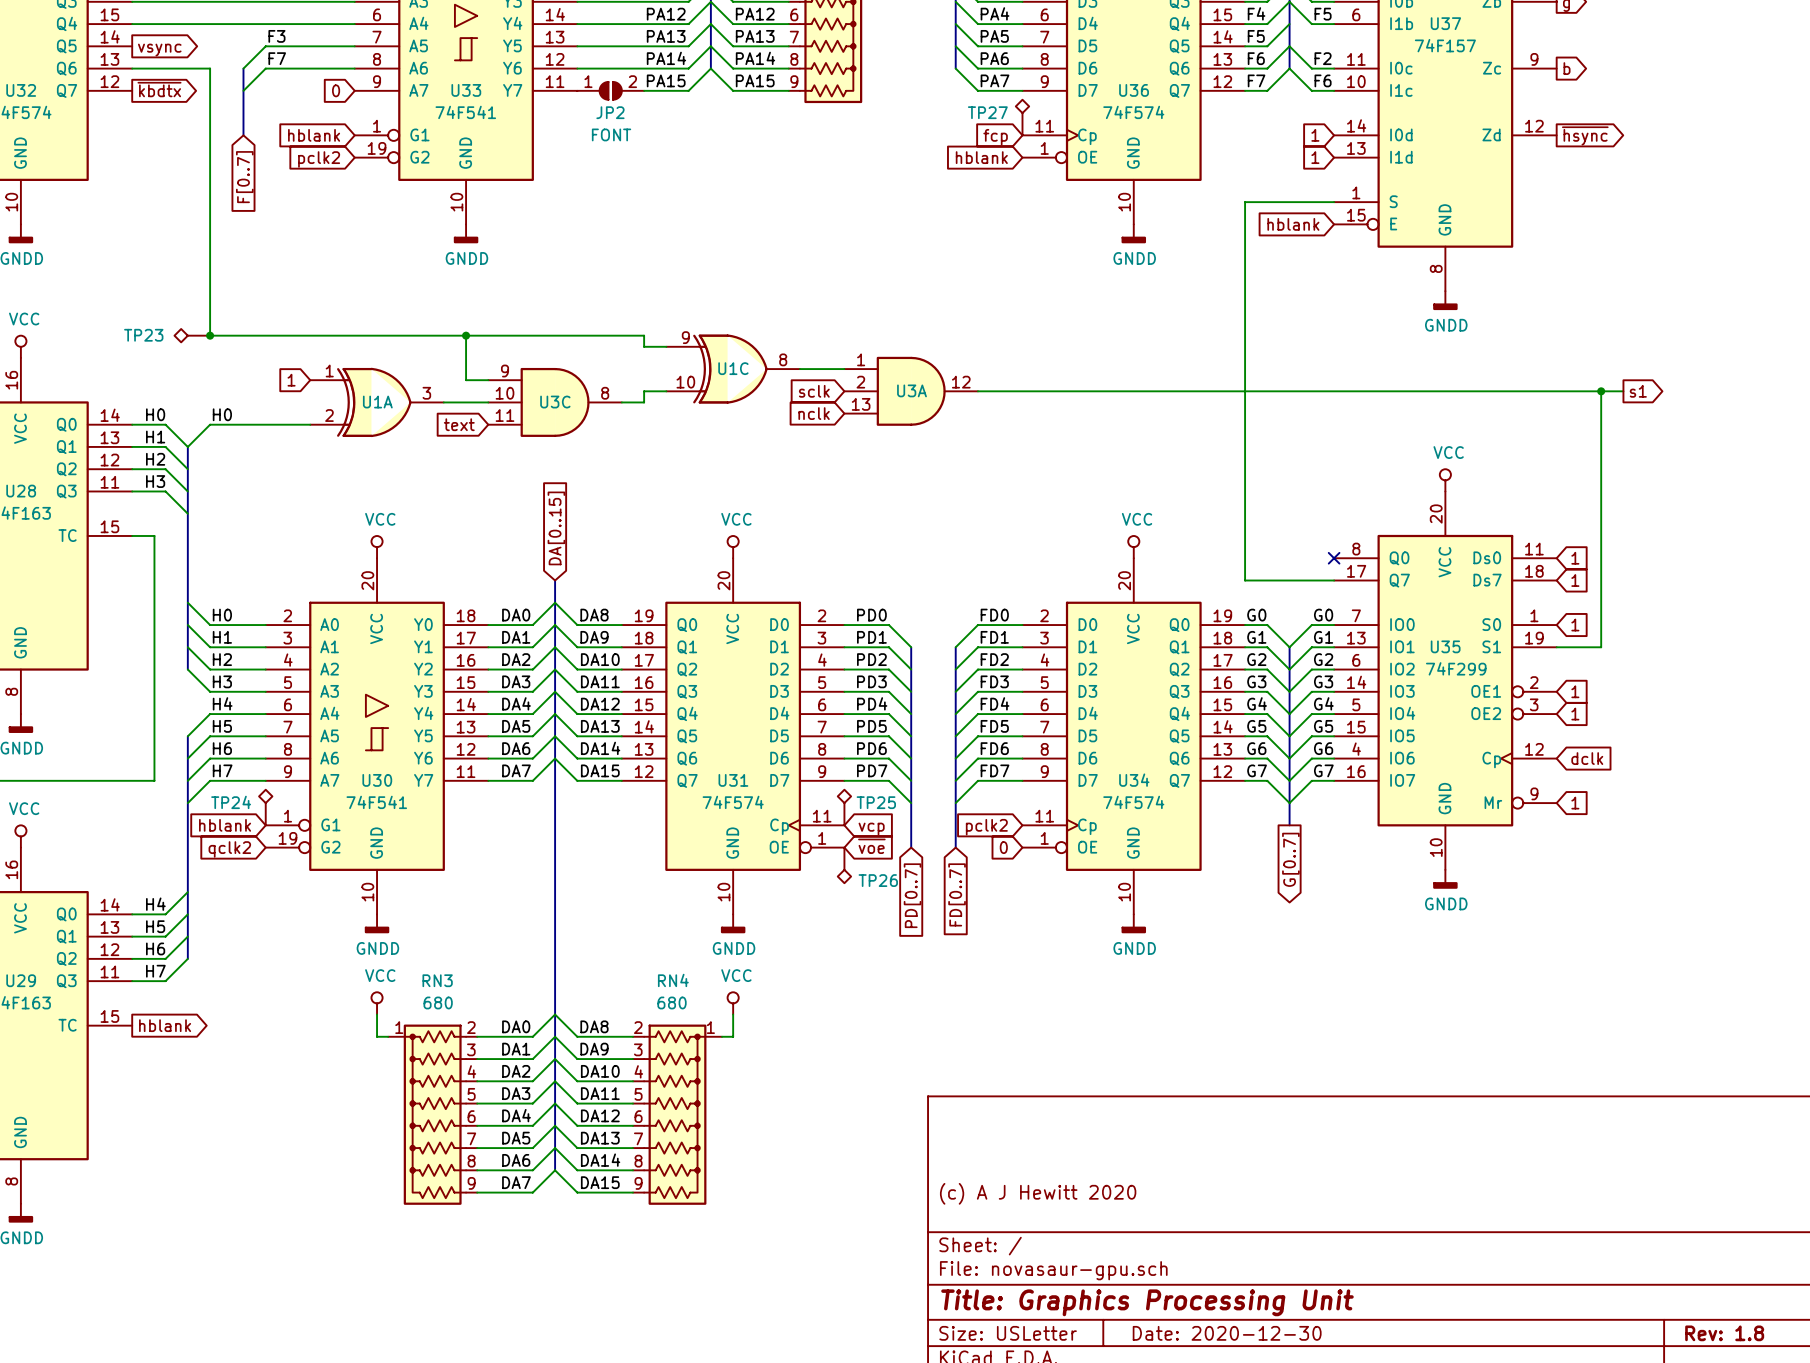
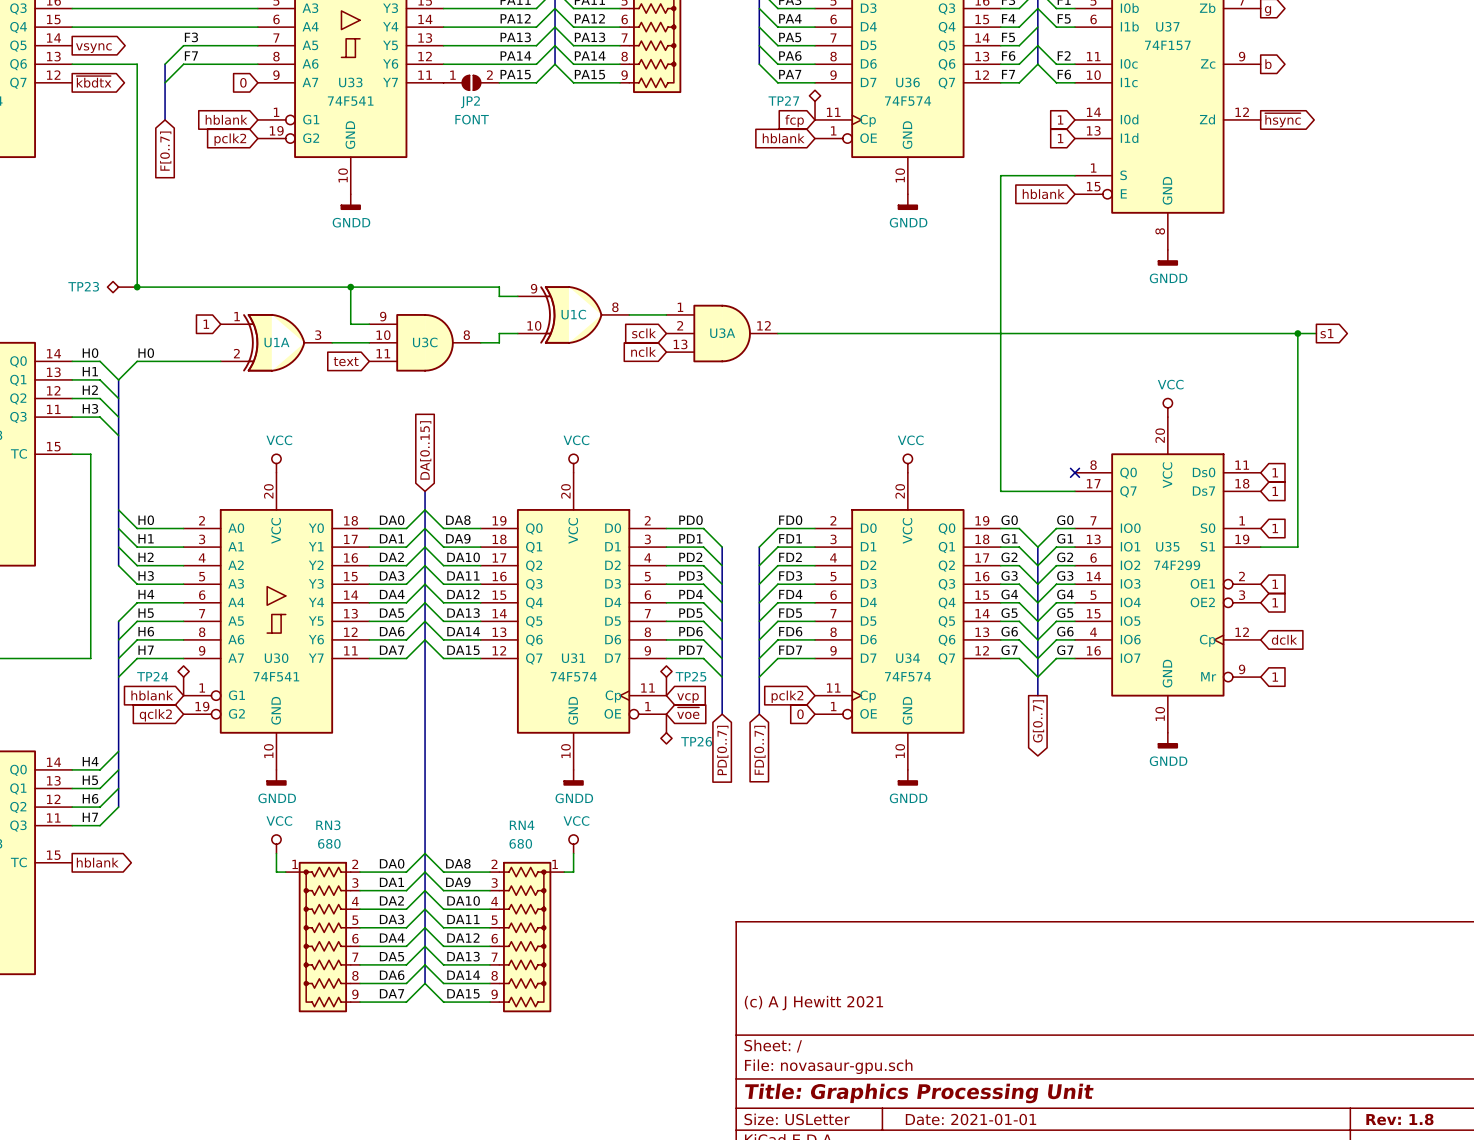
title block: (c) A J Hewitt 2020 (1038, 1193) -> (c) A J Hewitt 2021 (813, 1003)
title block: Date: 2020-12-30 (1227, 1333) -> Date: 2021-01-01 (971, 1119)

